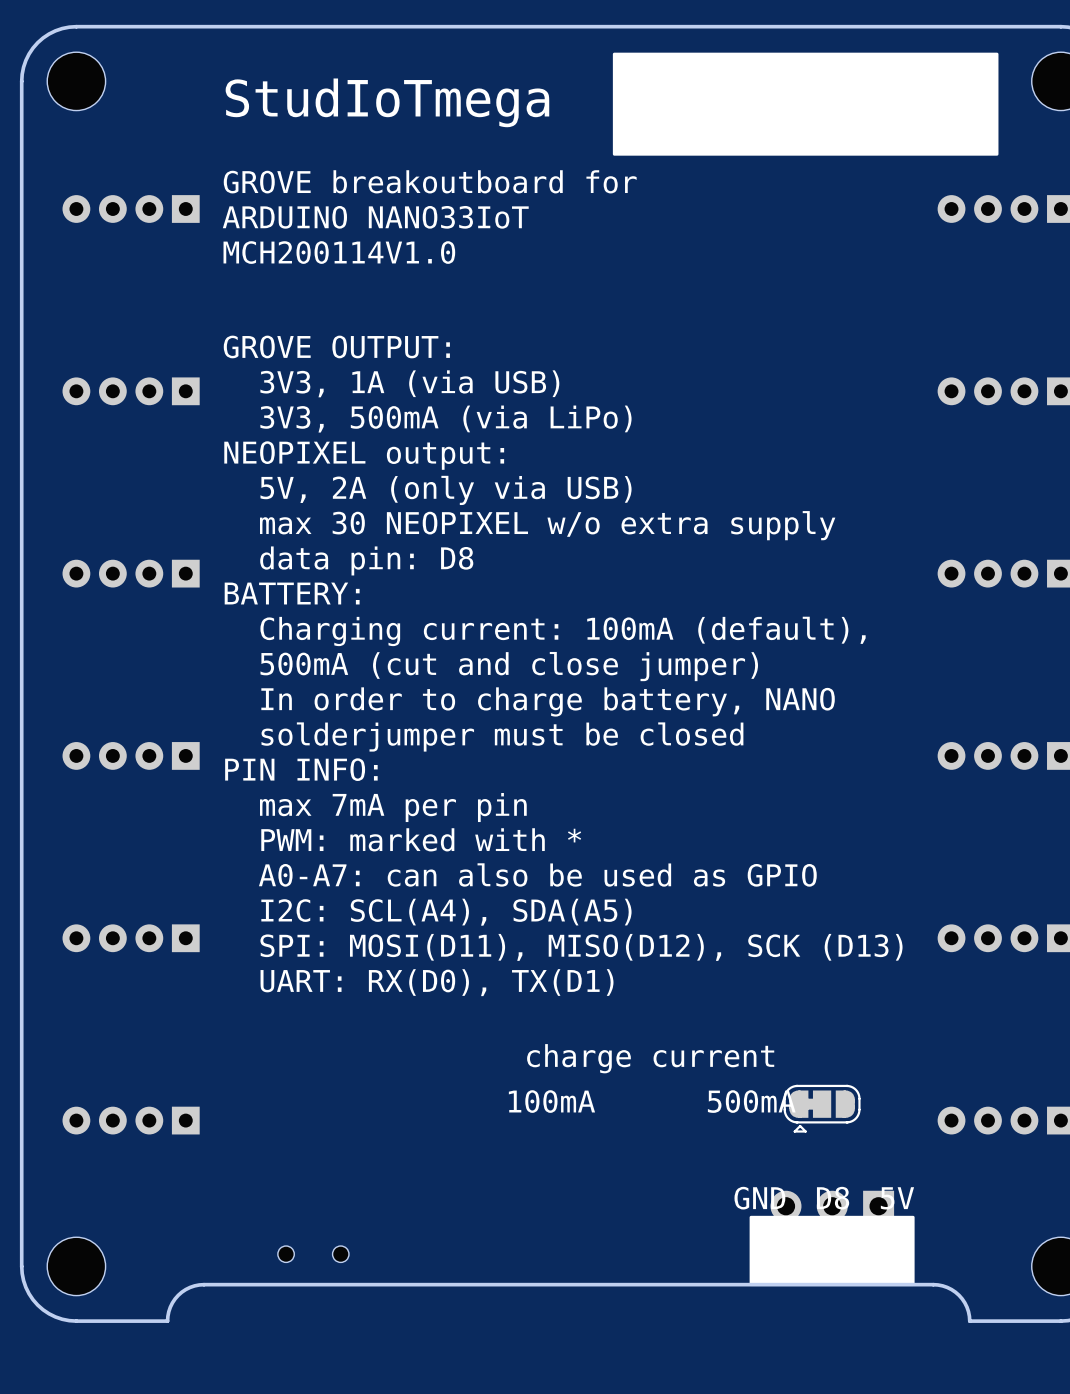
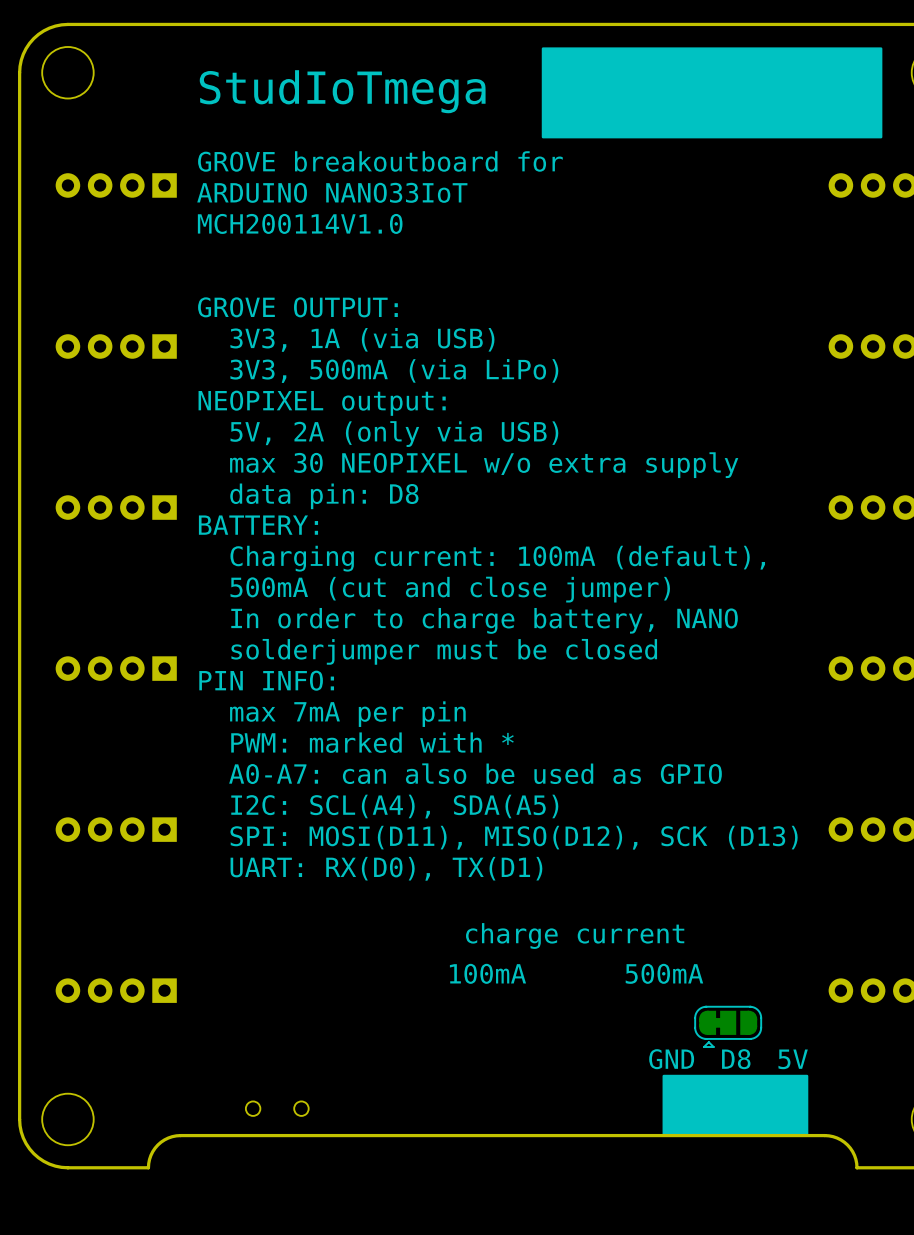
part position: (822, 1108) -> (728, 1026)
part: (832, 1206) -> none

